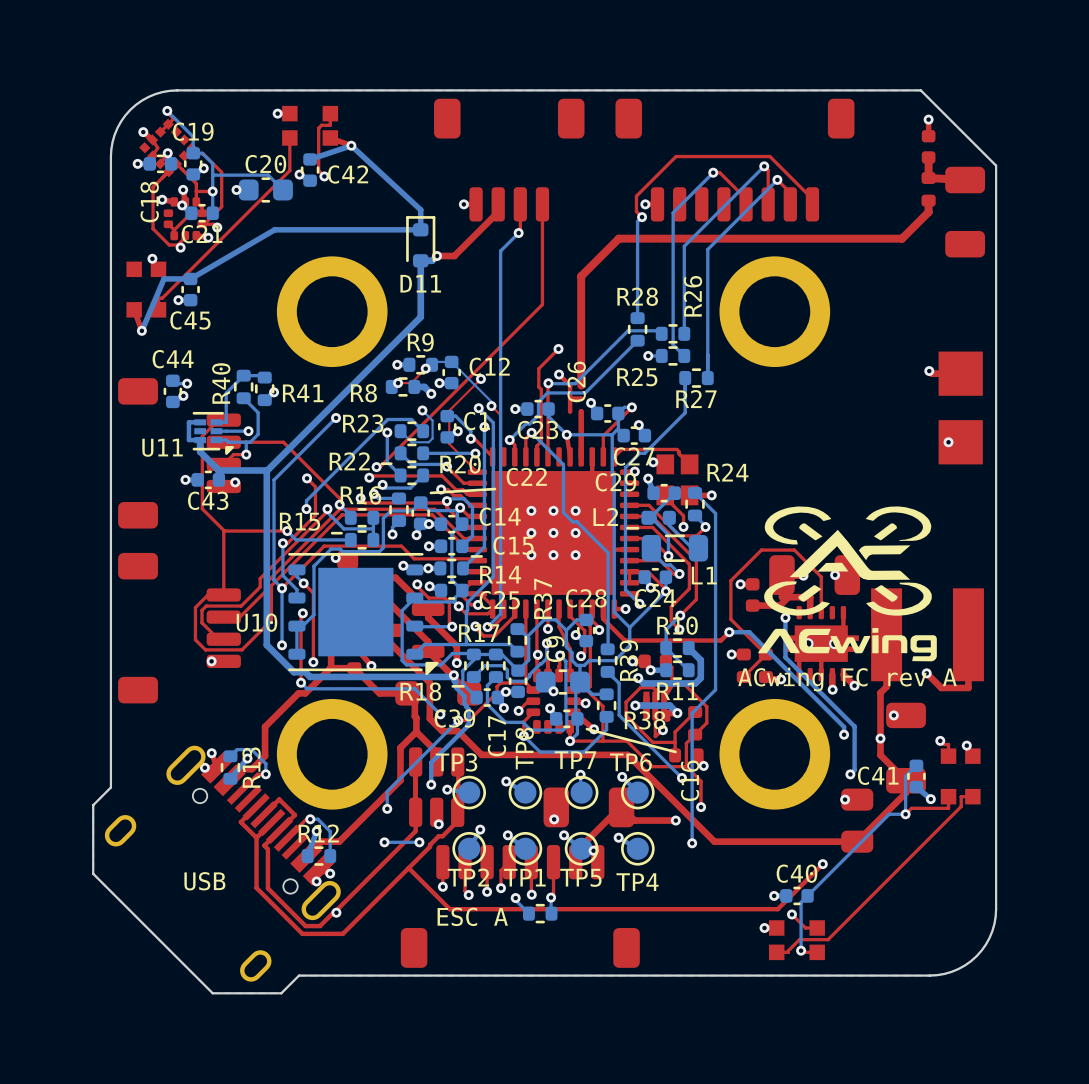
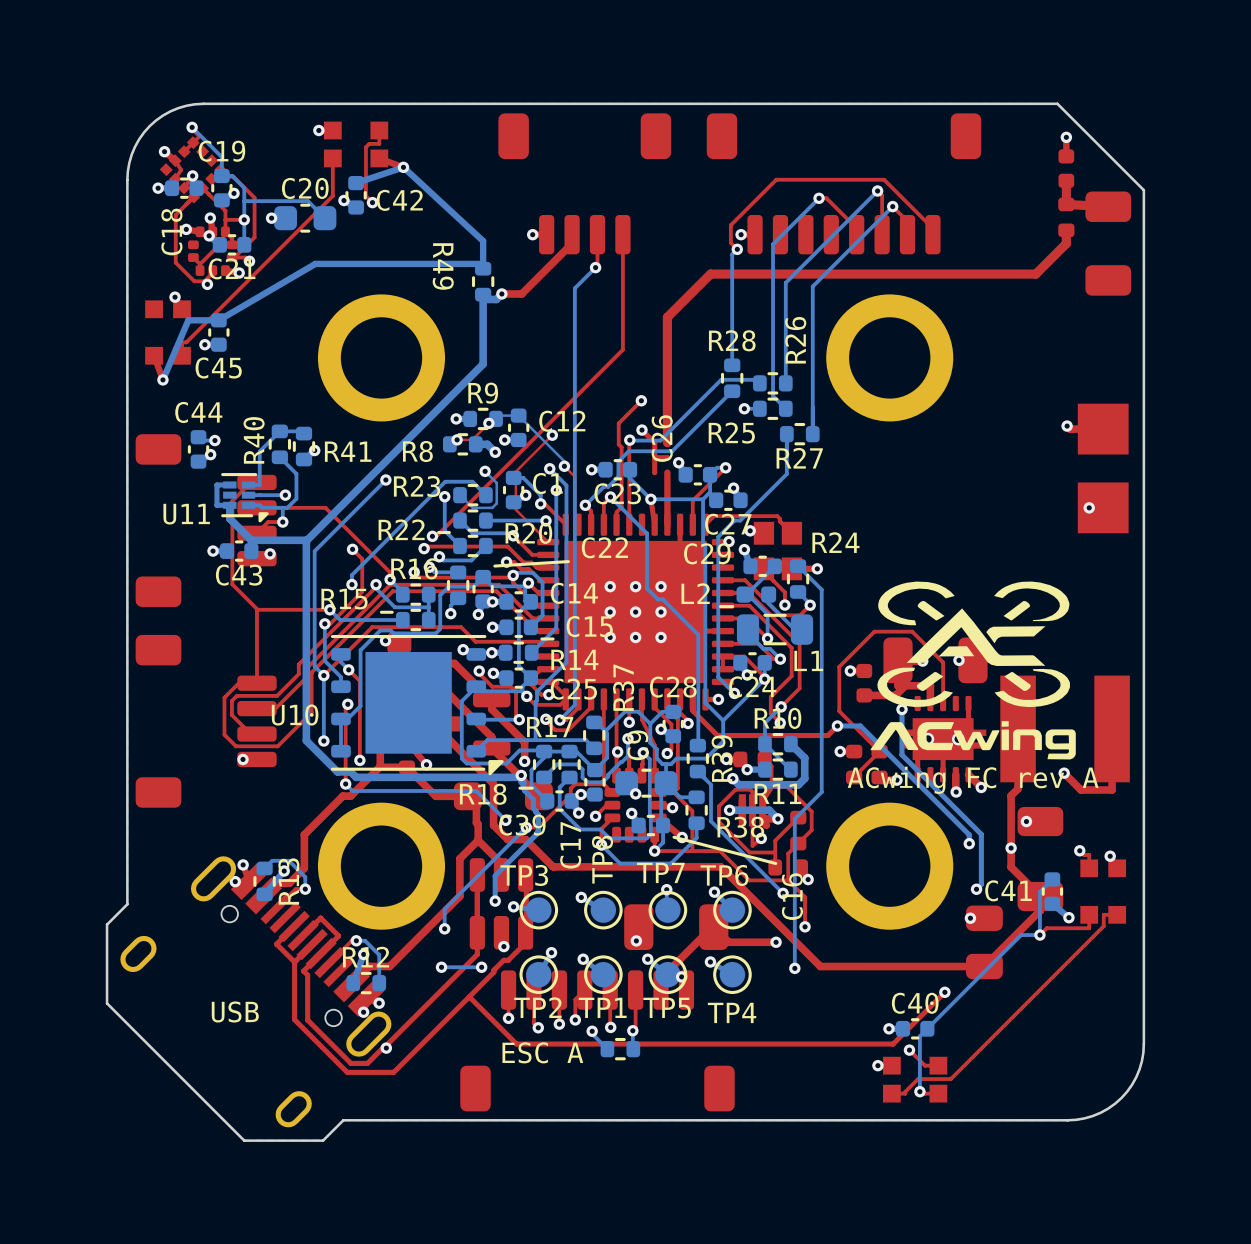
D11: (420, 241) -> none
R49: none -> (483, 281)

